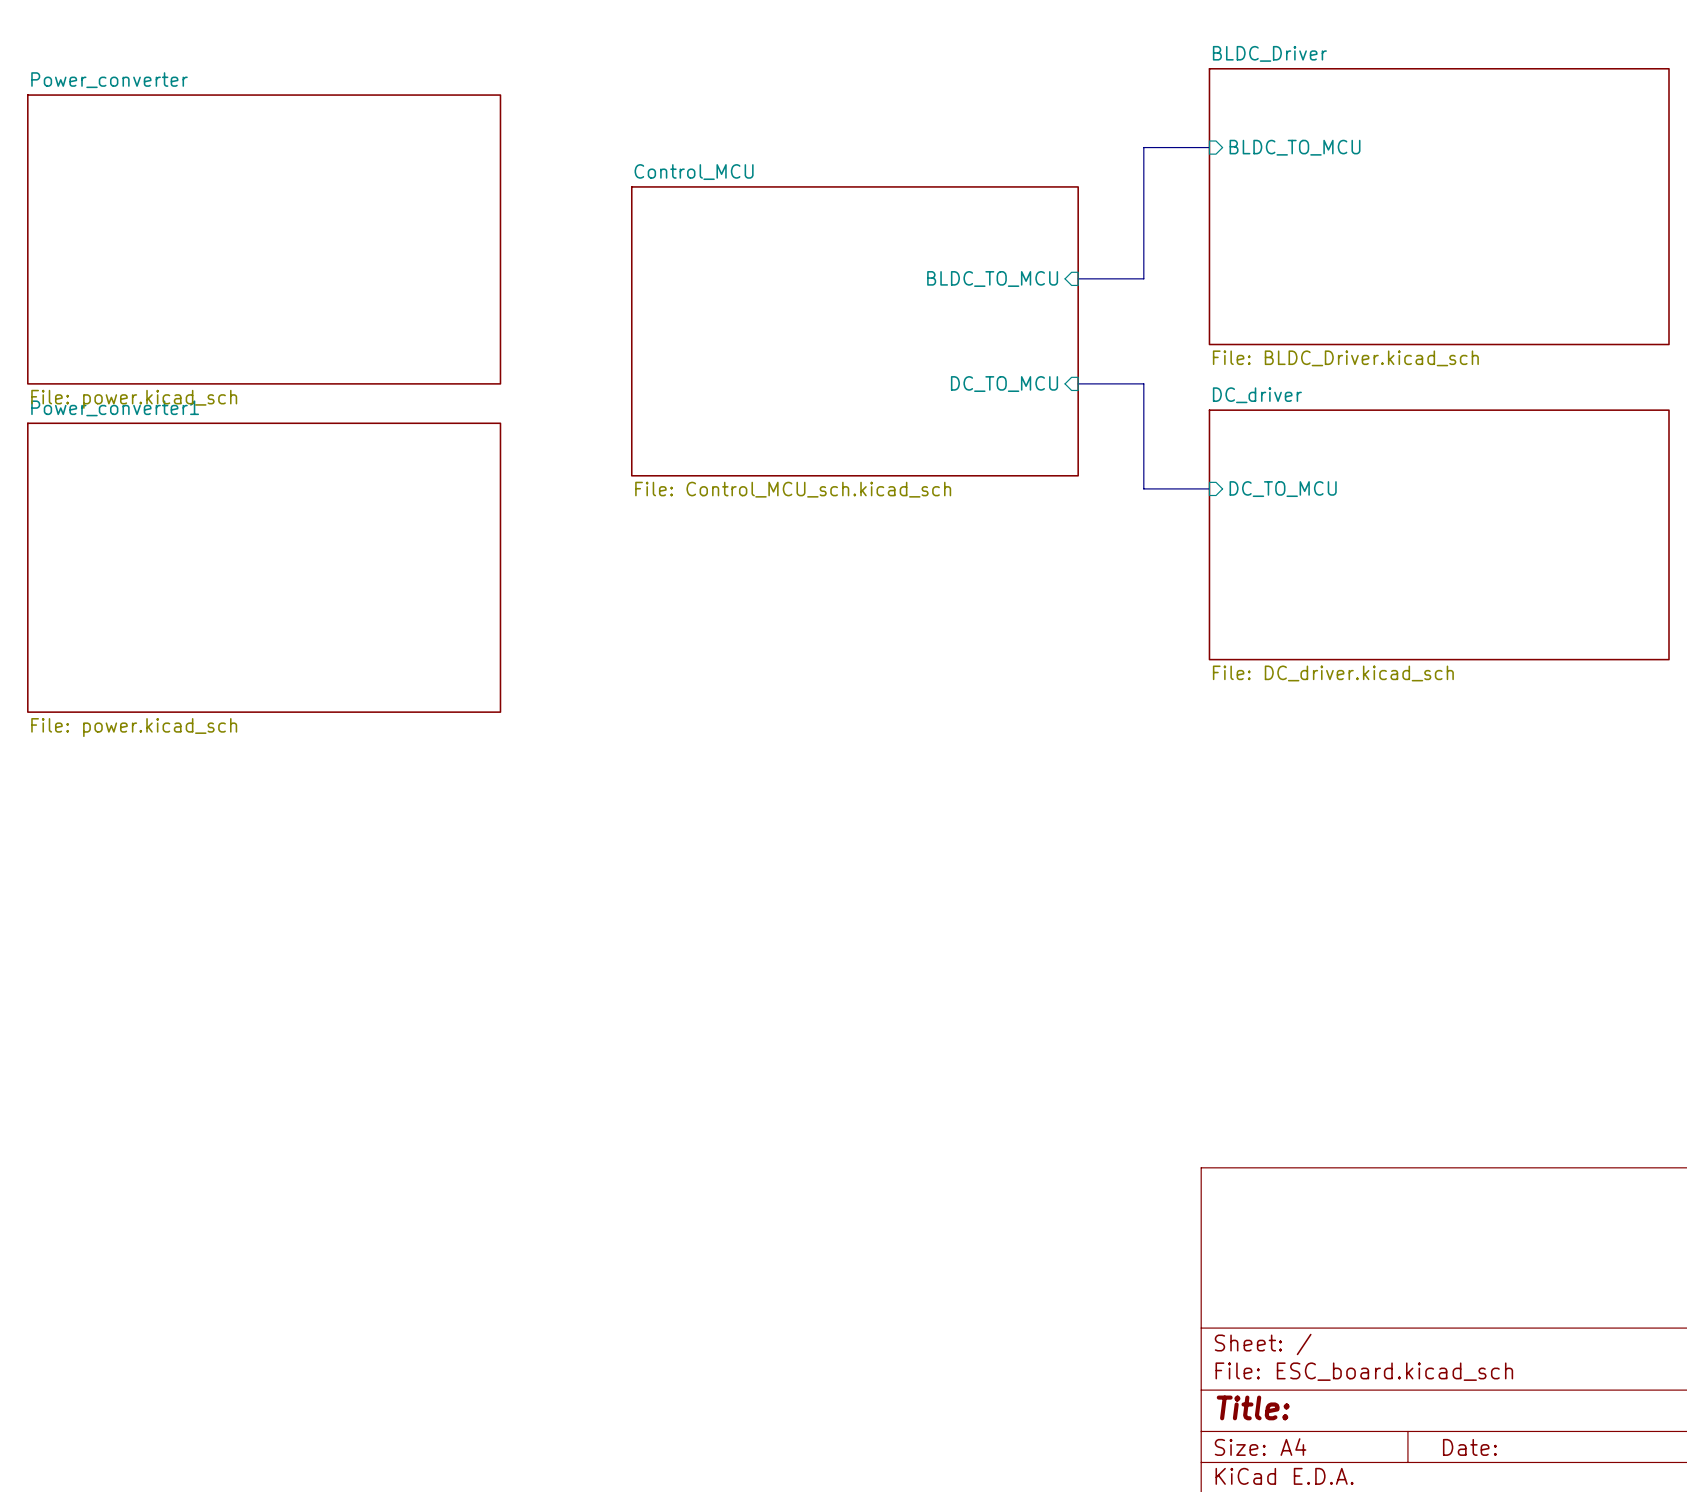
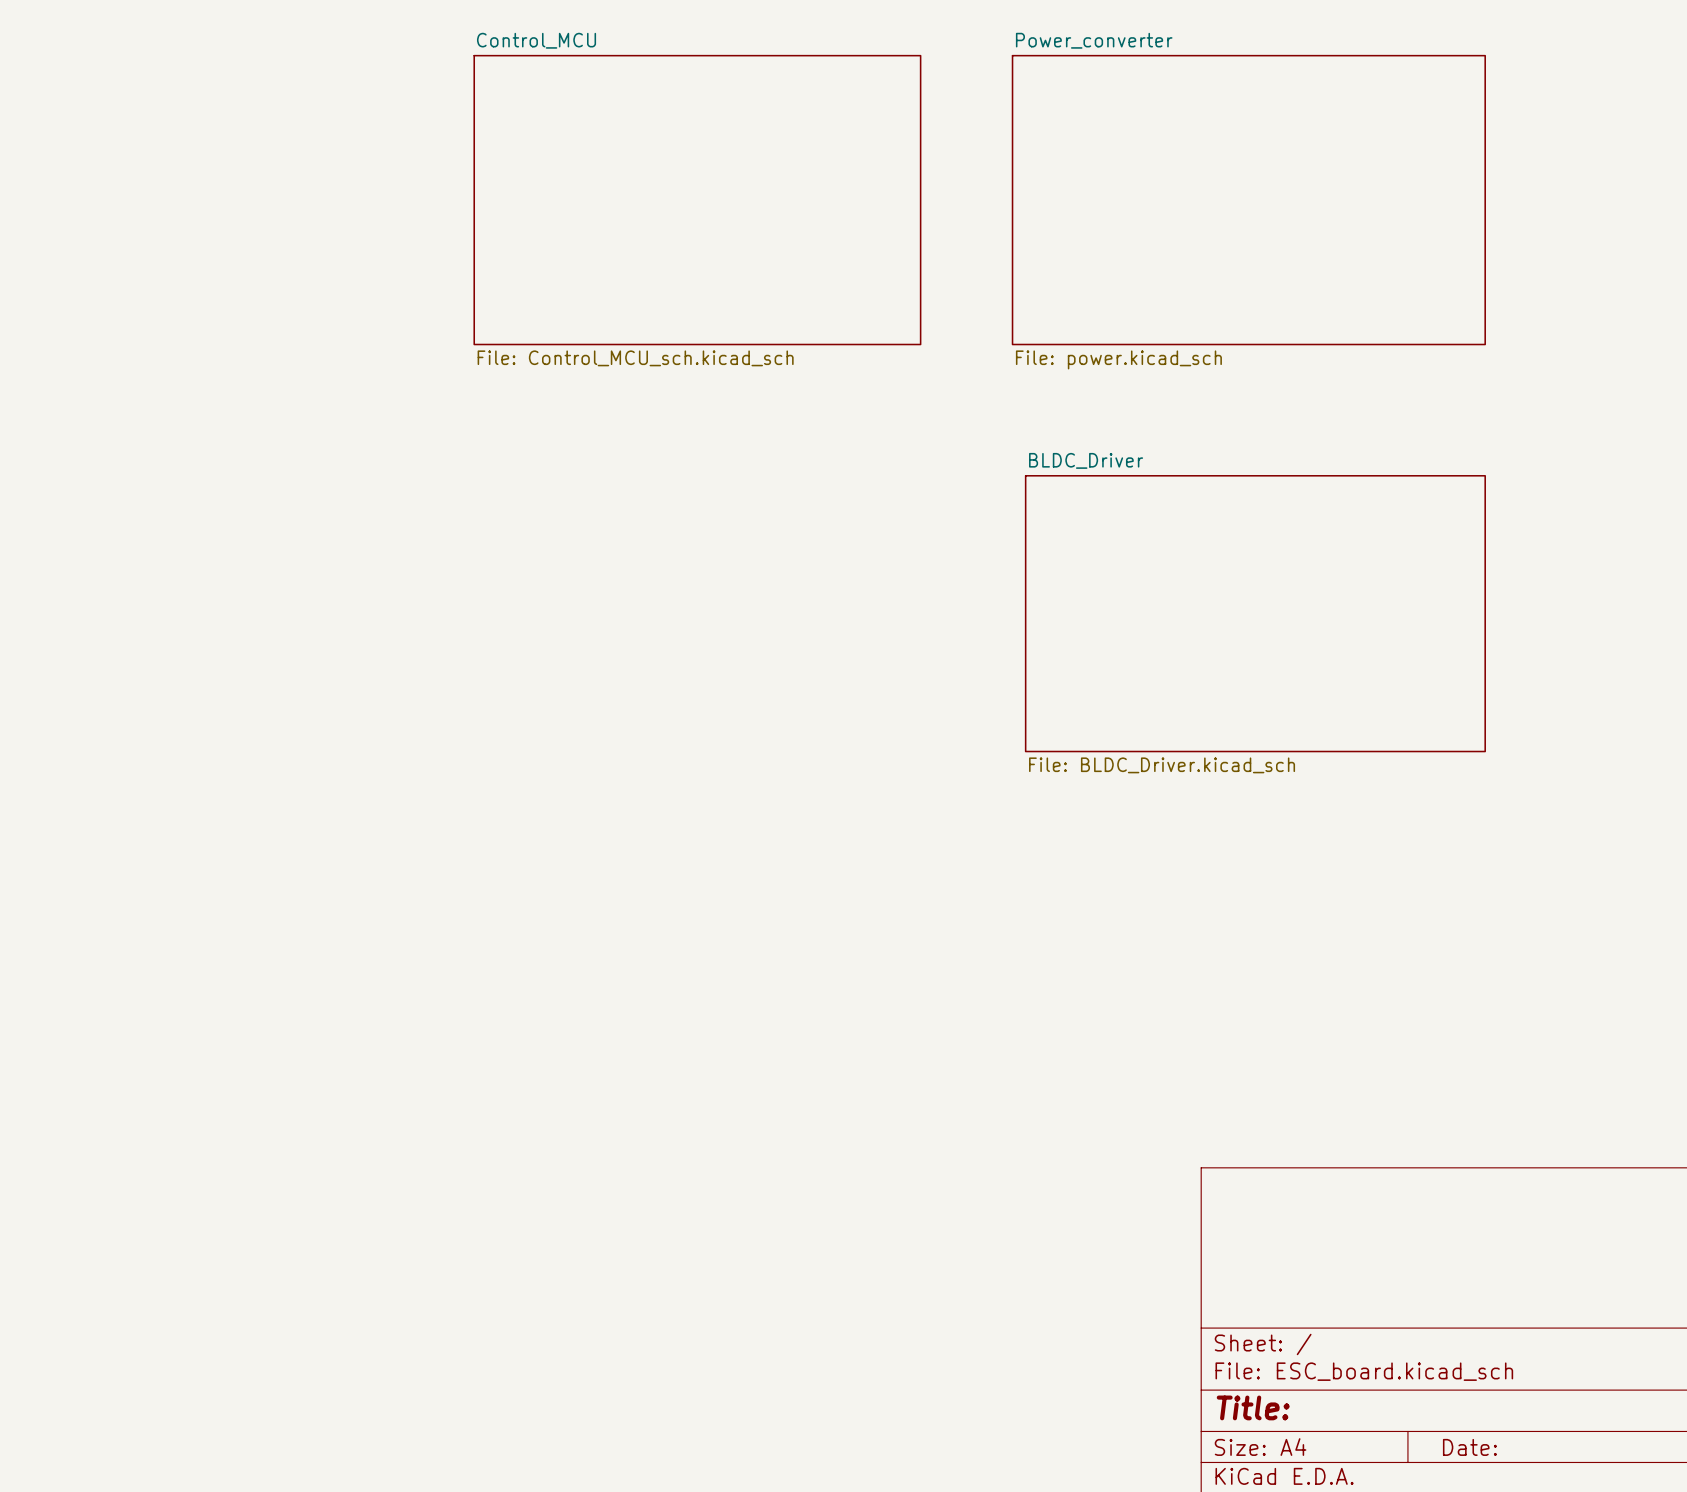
bus: (1209, 147) (1143, 147) (1143, 278) (1078, 278) -> none
sheet pin: BLDC_TO_MCU (1295, 147) -> none
sheet Power_converter: none -> File: power.kicad_sch (1248, 200)
sheet BLDC_Driver: File: BLDC_Driver.kicad_sch (1439, 206) -> none
sheet Power_converter: File: power.kicad_sch (264, 239) -> none
sheet pin: BLDC_TO_MCU (992, 278) -> none
sheet Control_MCU position: (854, 331) -> (697, 200)
bus: (1078, 383) (1143, 383) (1143, 488) (1209, 488) -> none
sheet pin: DC_TO_MCU (1004, 384) -> none
sheet pin: DC_TO_MCU (1283, 489) -> none
sheet DC_driver: File: DC_driver.kicad_sch (1439, 534) -> none
sheet Power_converter1: File: power.kicad_sch (264, 567) -> none
sheet BLDC_Driver: none -> File: BLDC_Driver.kicad_sch (1255, 613)

